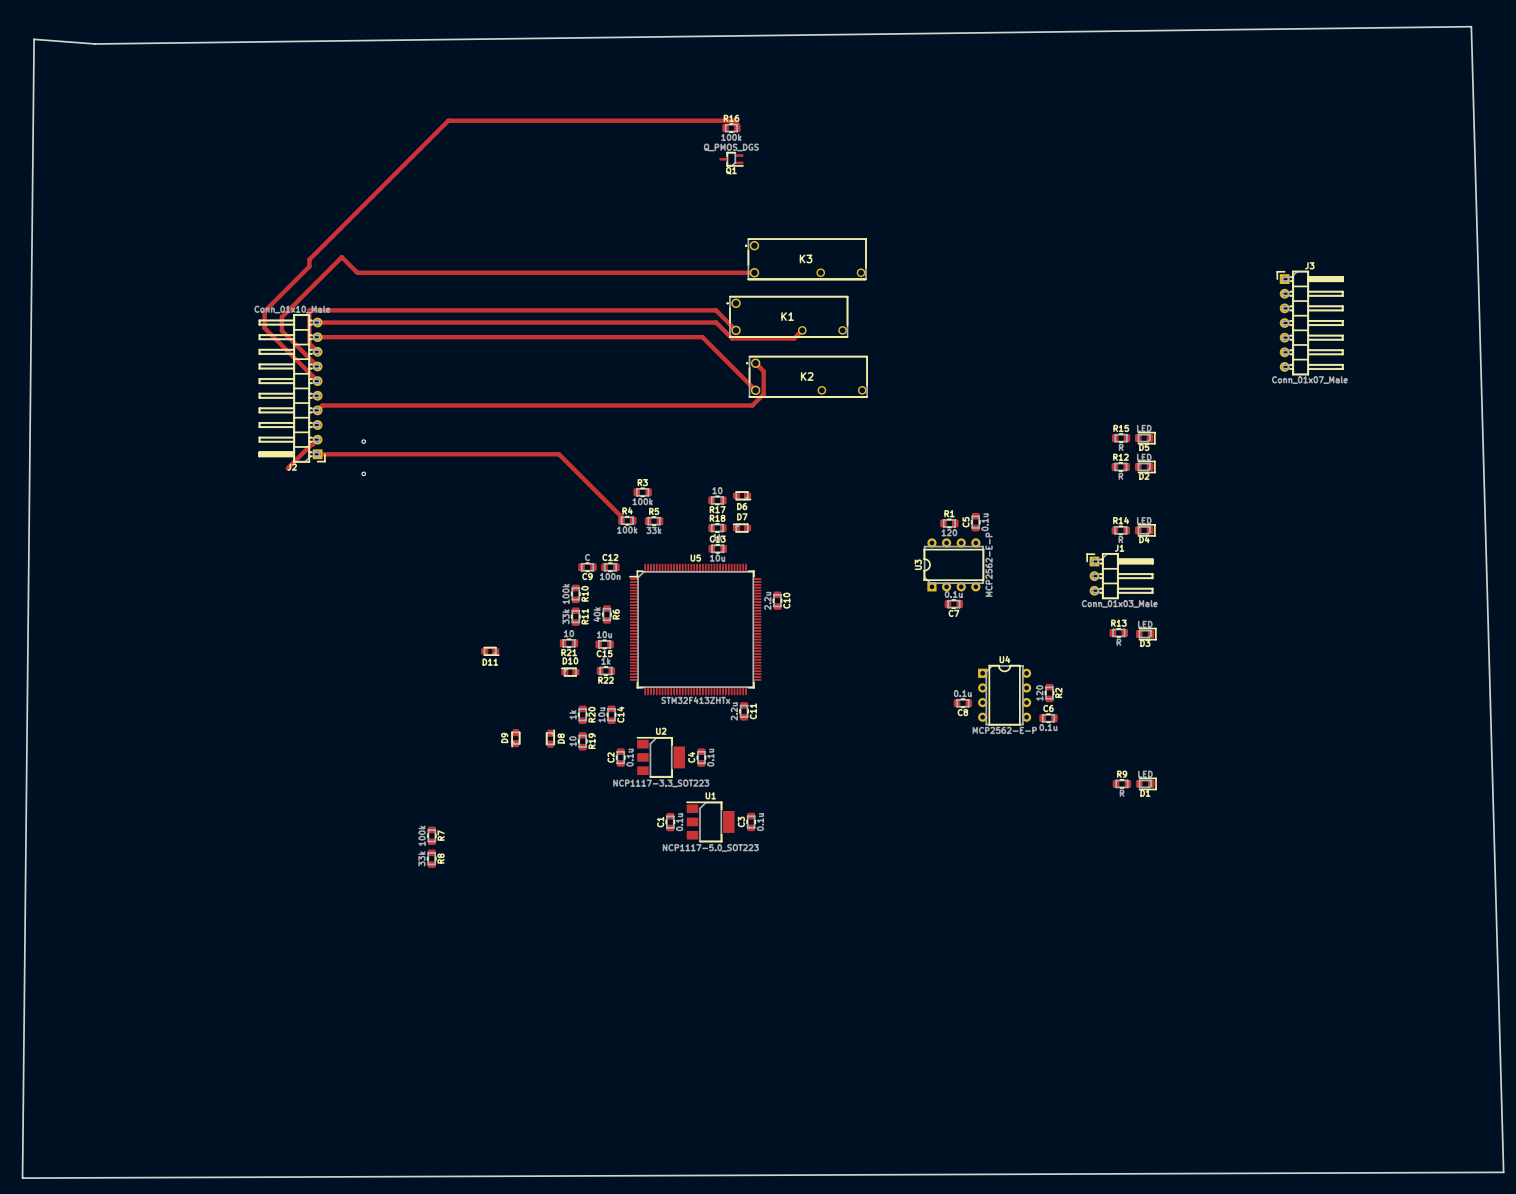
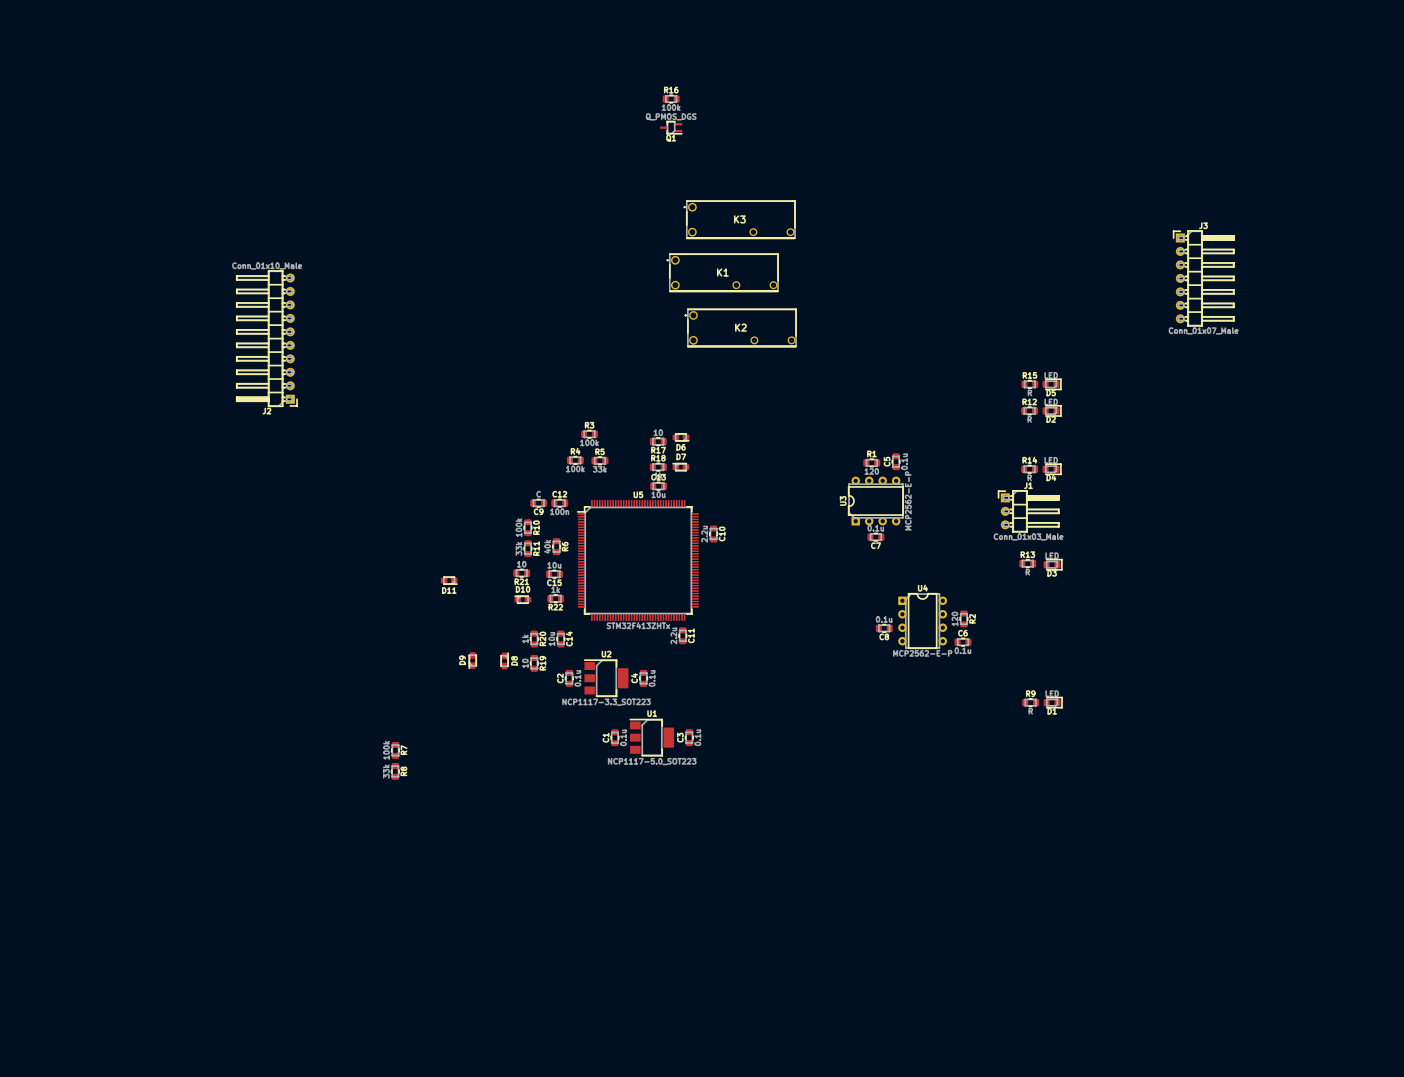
board edge: (1471, 26) (1503, 1172) (22, 1178) (34, 39) (95, 43) (1471, 26) -> none
track: (737, 128) (737, 124) (733, 120) (448, 120) (309, 259) (309, 266) (264, 311) (264, 328) (317, 381) -> none
track: (754, 272) (357, 272) (341, 257) (281, 317) (281, 330) (317, 366) -> none
track: (317, 322) (716, 322) (732, 338) (794, 338) (802, 330) -> none
track: (736, 330) (716, 310) (309, 310) (309, 343) (317, 351) -> none
track: (317, 337) (702, 337) (755, 390) -> none
track: (755, 363) (763, 371) (763, 394) (752, 405) (322, 405) (317, 410) -> none
track: (317, 439) (287, 468) -> none
via: (363, 441) -> none
track: (317, 454) (559, 454) (621, 516) (621, 520) -> none
via: (363, 473) -> none

